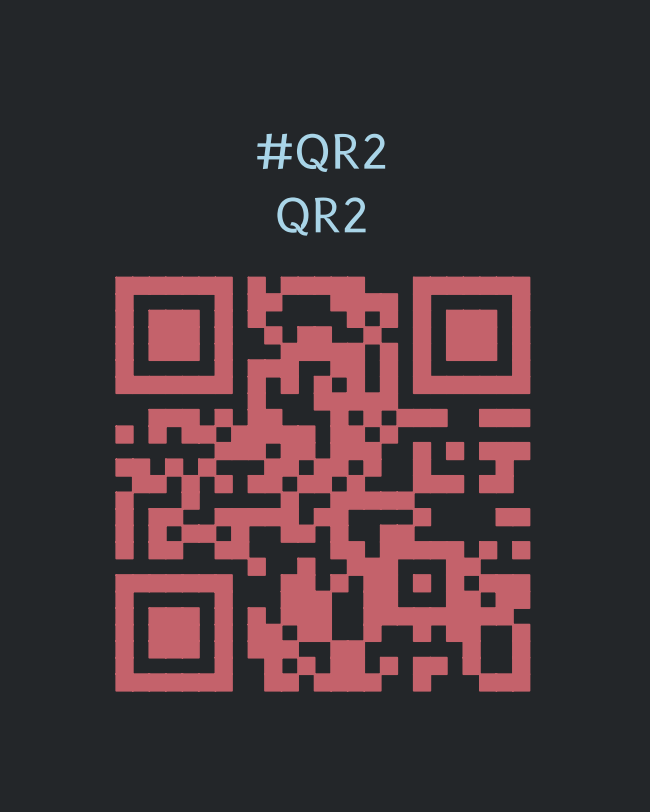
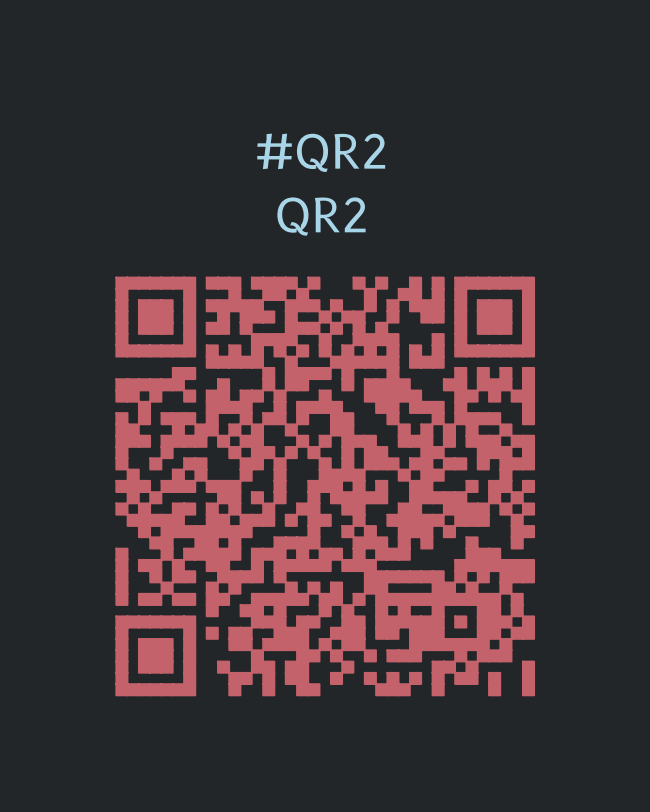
#QR2 shape: [116, 277, 530, 691] -> [116, 277, 535, 696]

